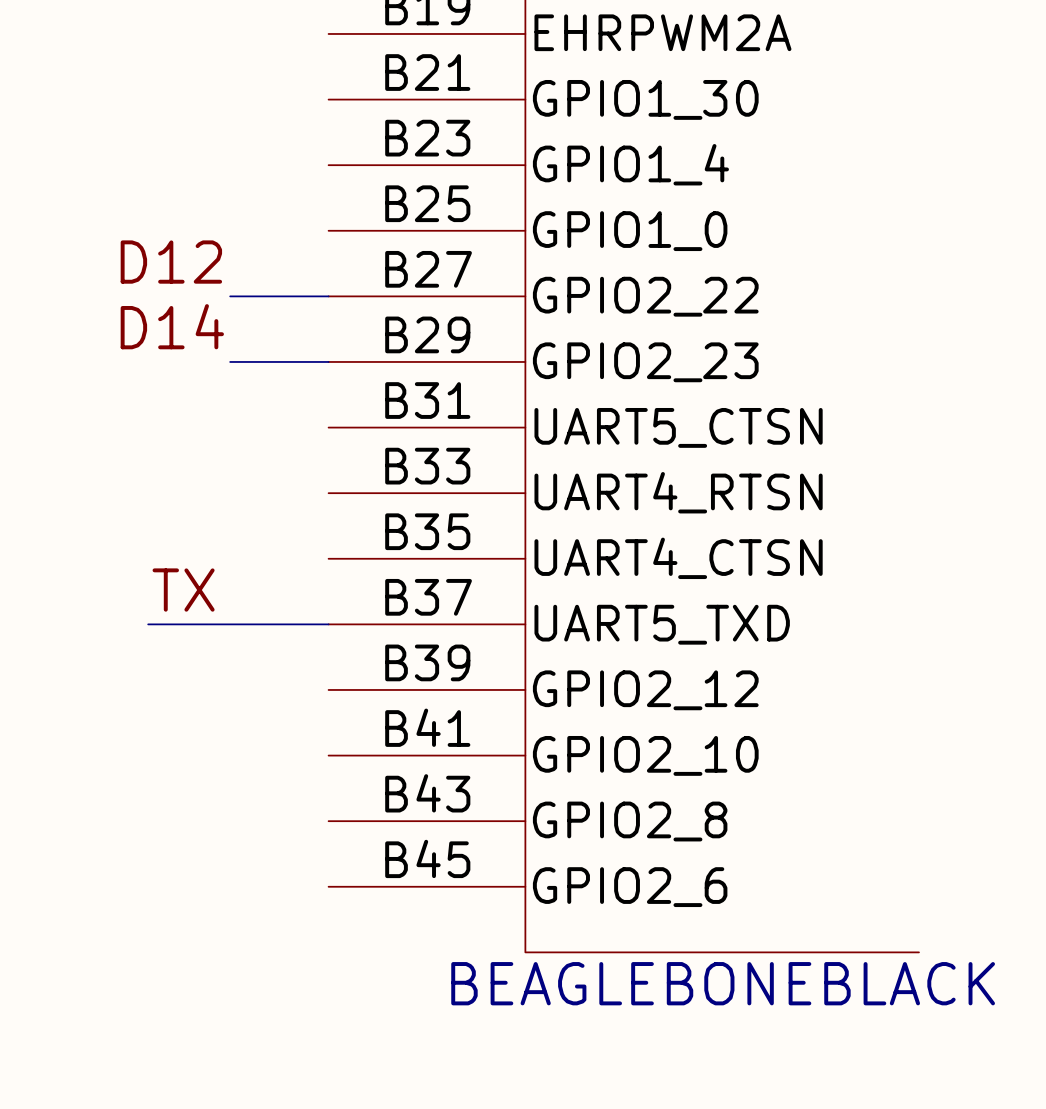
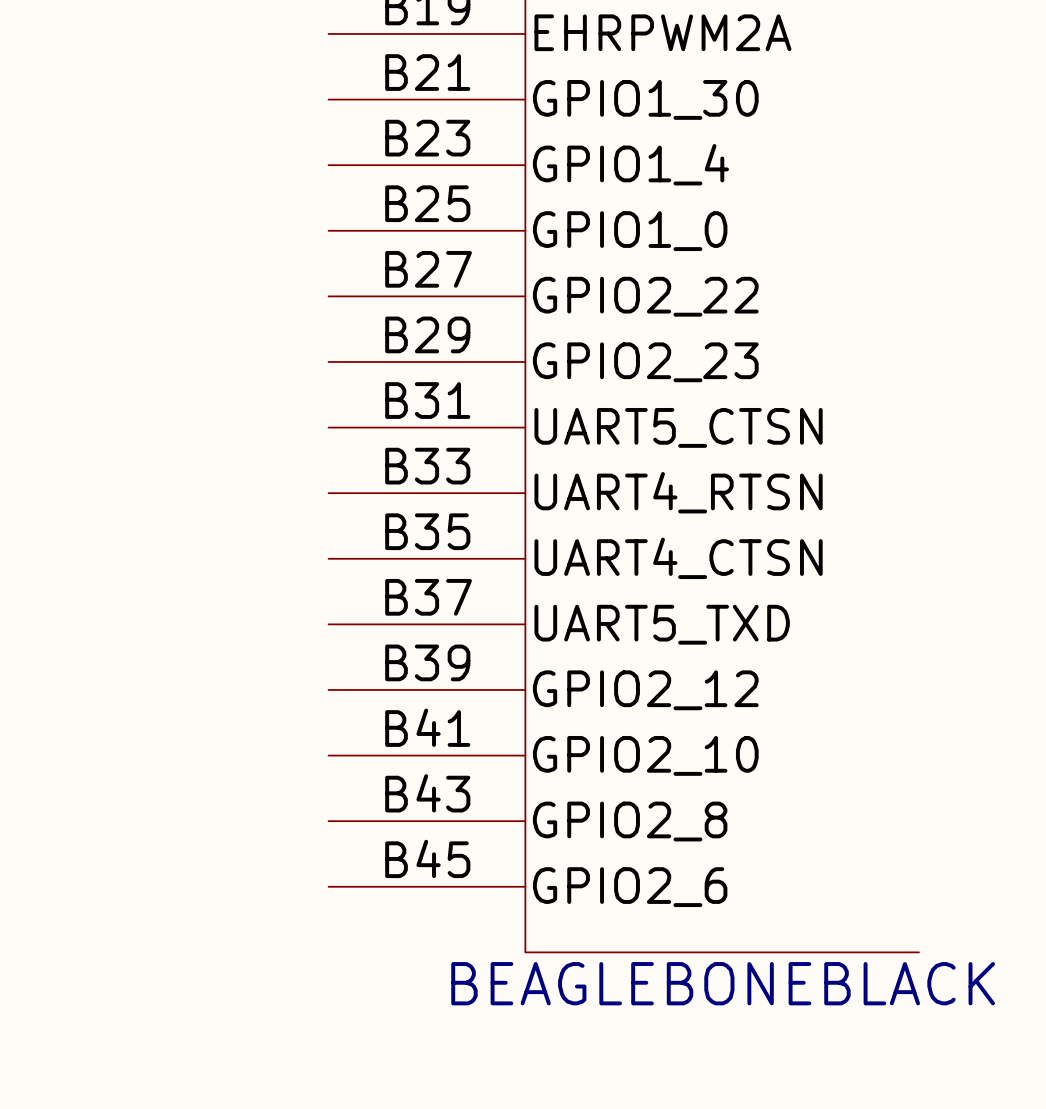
label: D12 (171, 262) -> none
wire: (230, 296) (328, 296) -> none
label: D14 (172, 326) -> none
wire: (230, 361) (328, 361) -> none
label: TX (183, 590) -> none
wire: (148, 624) (328, 624) -> none

